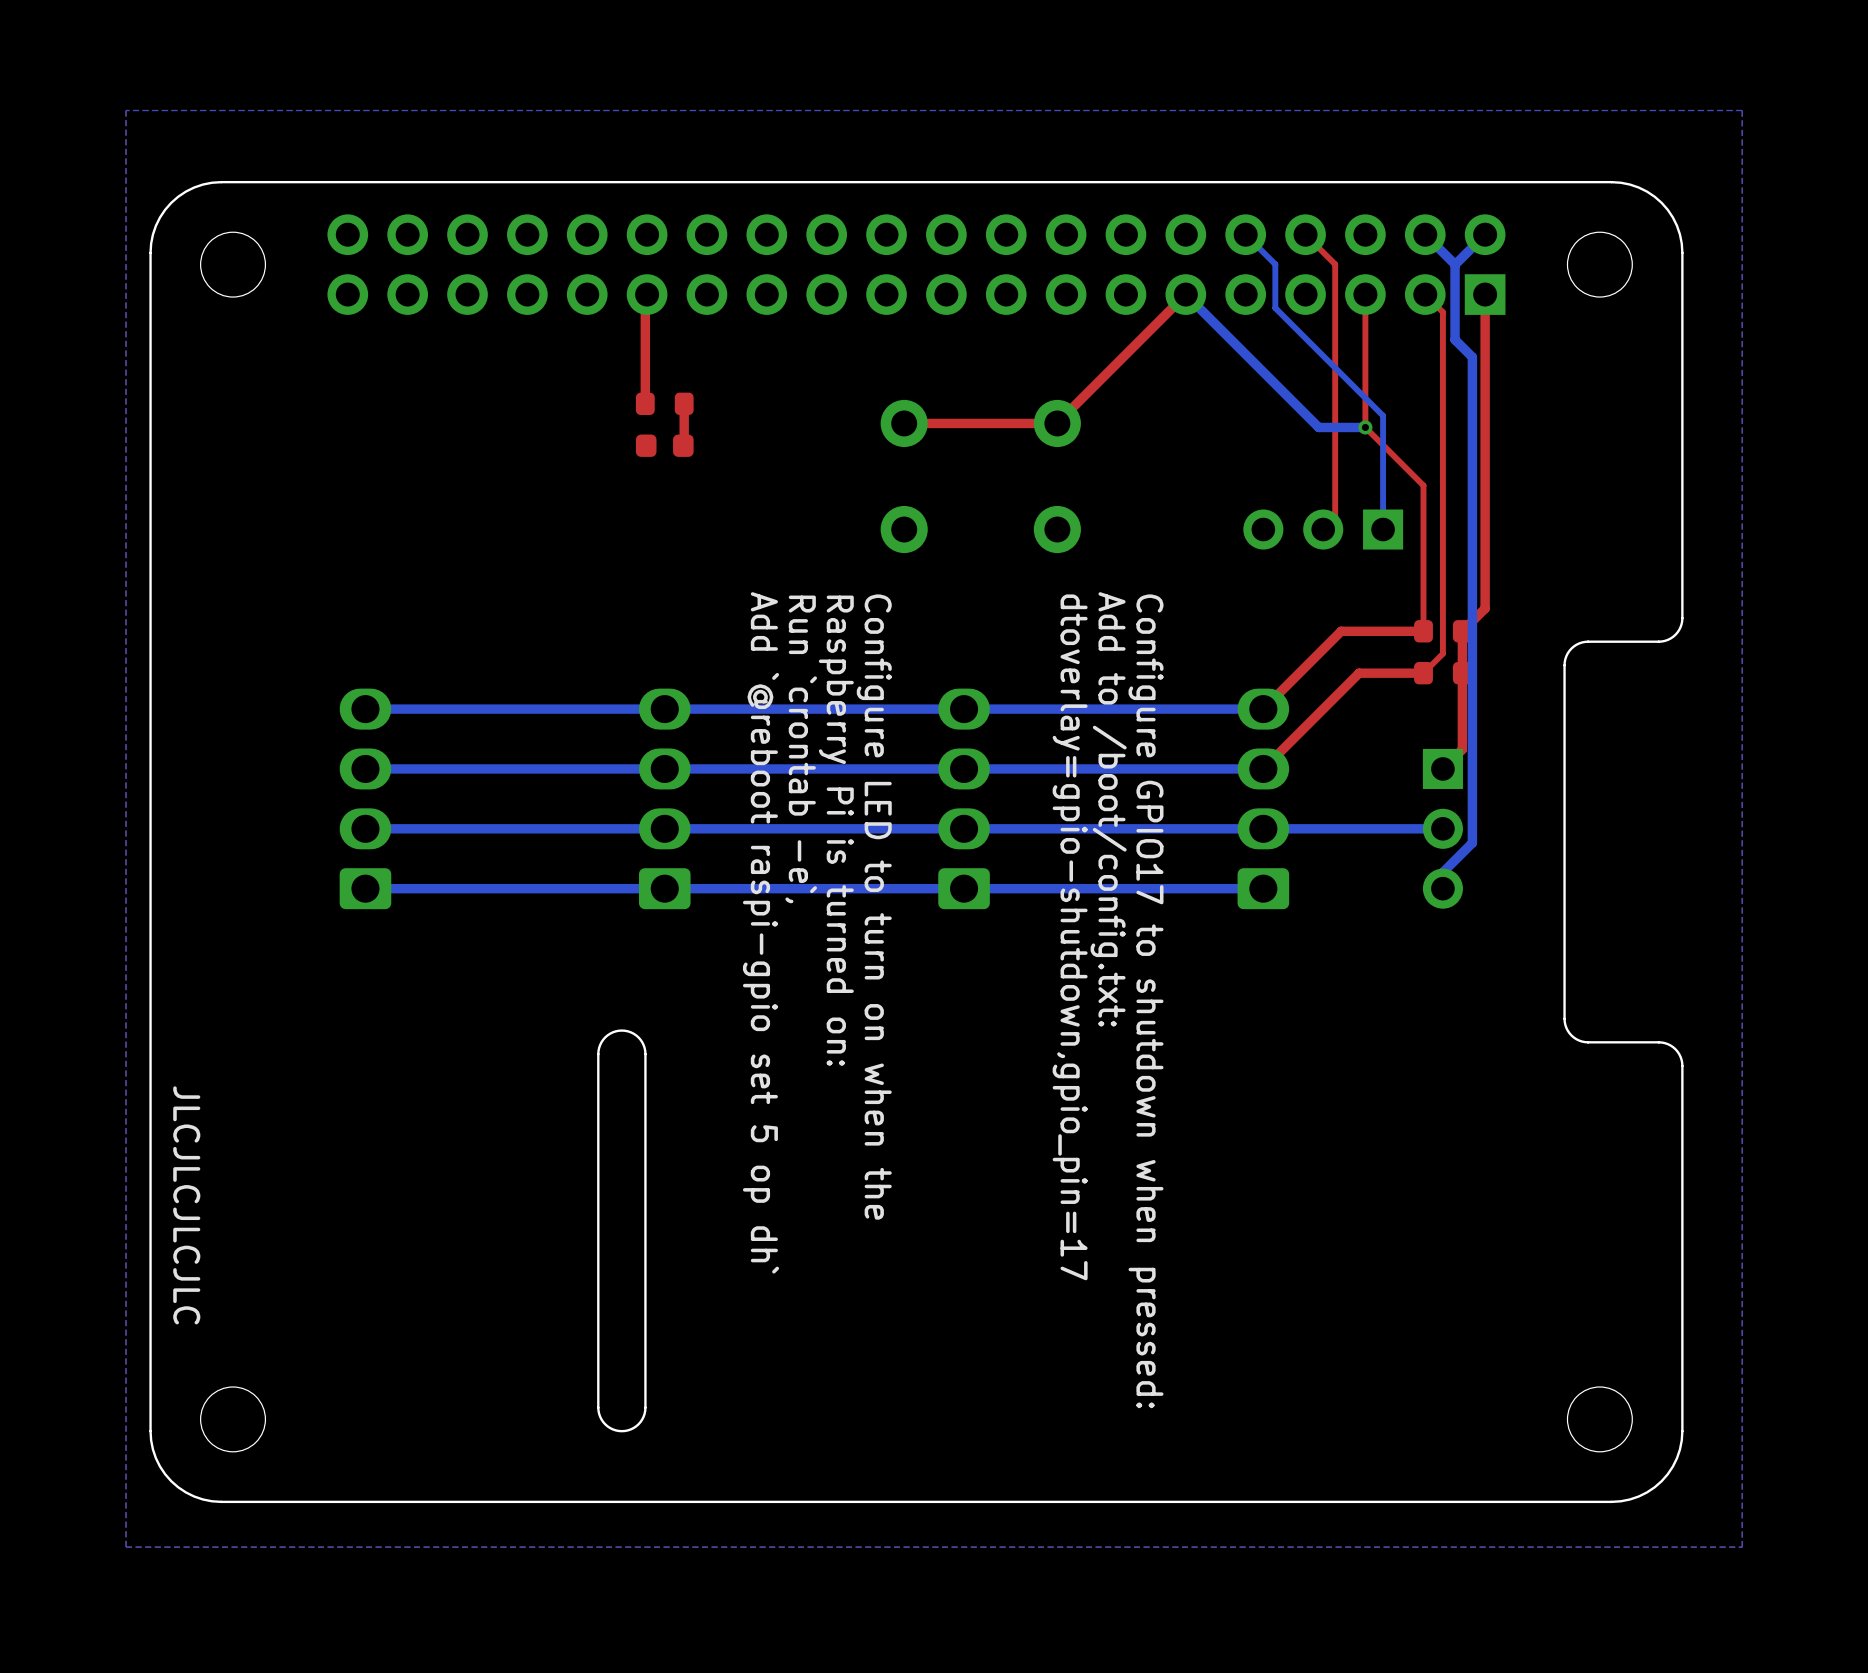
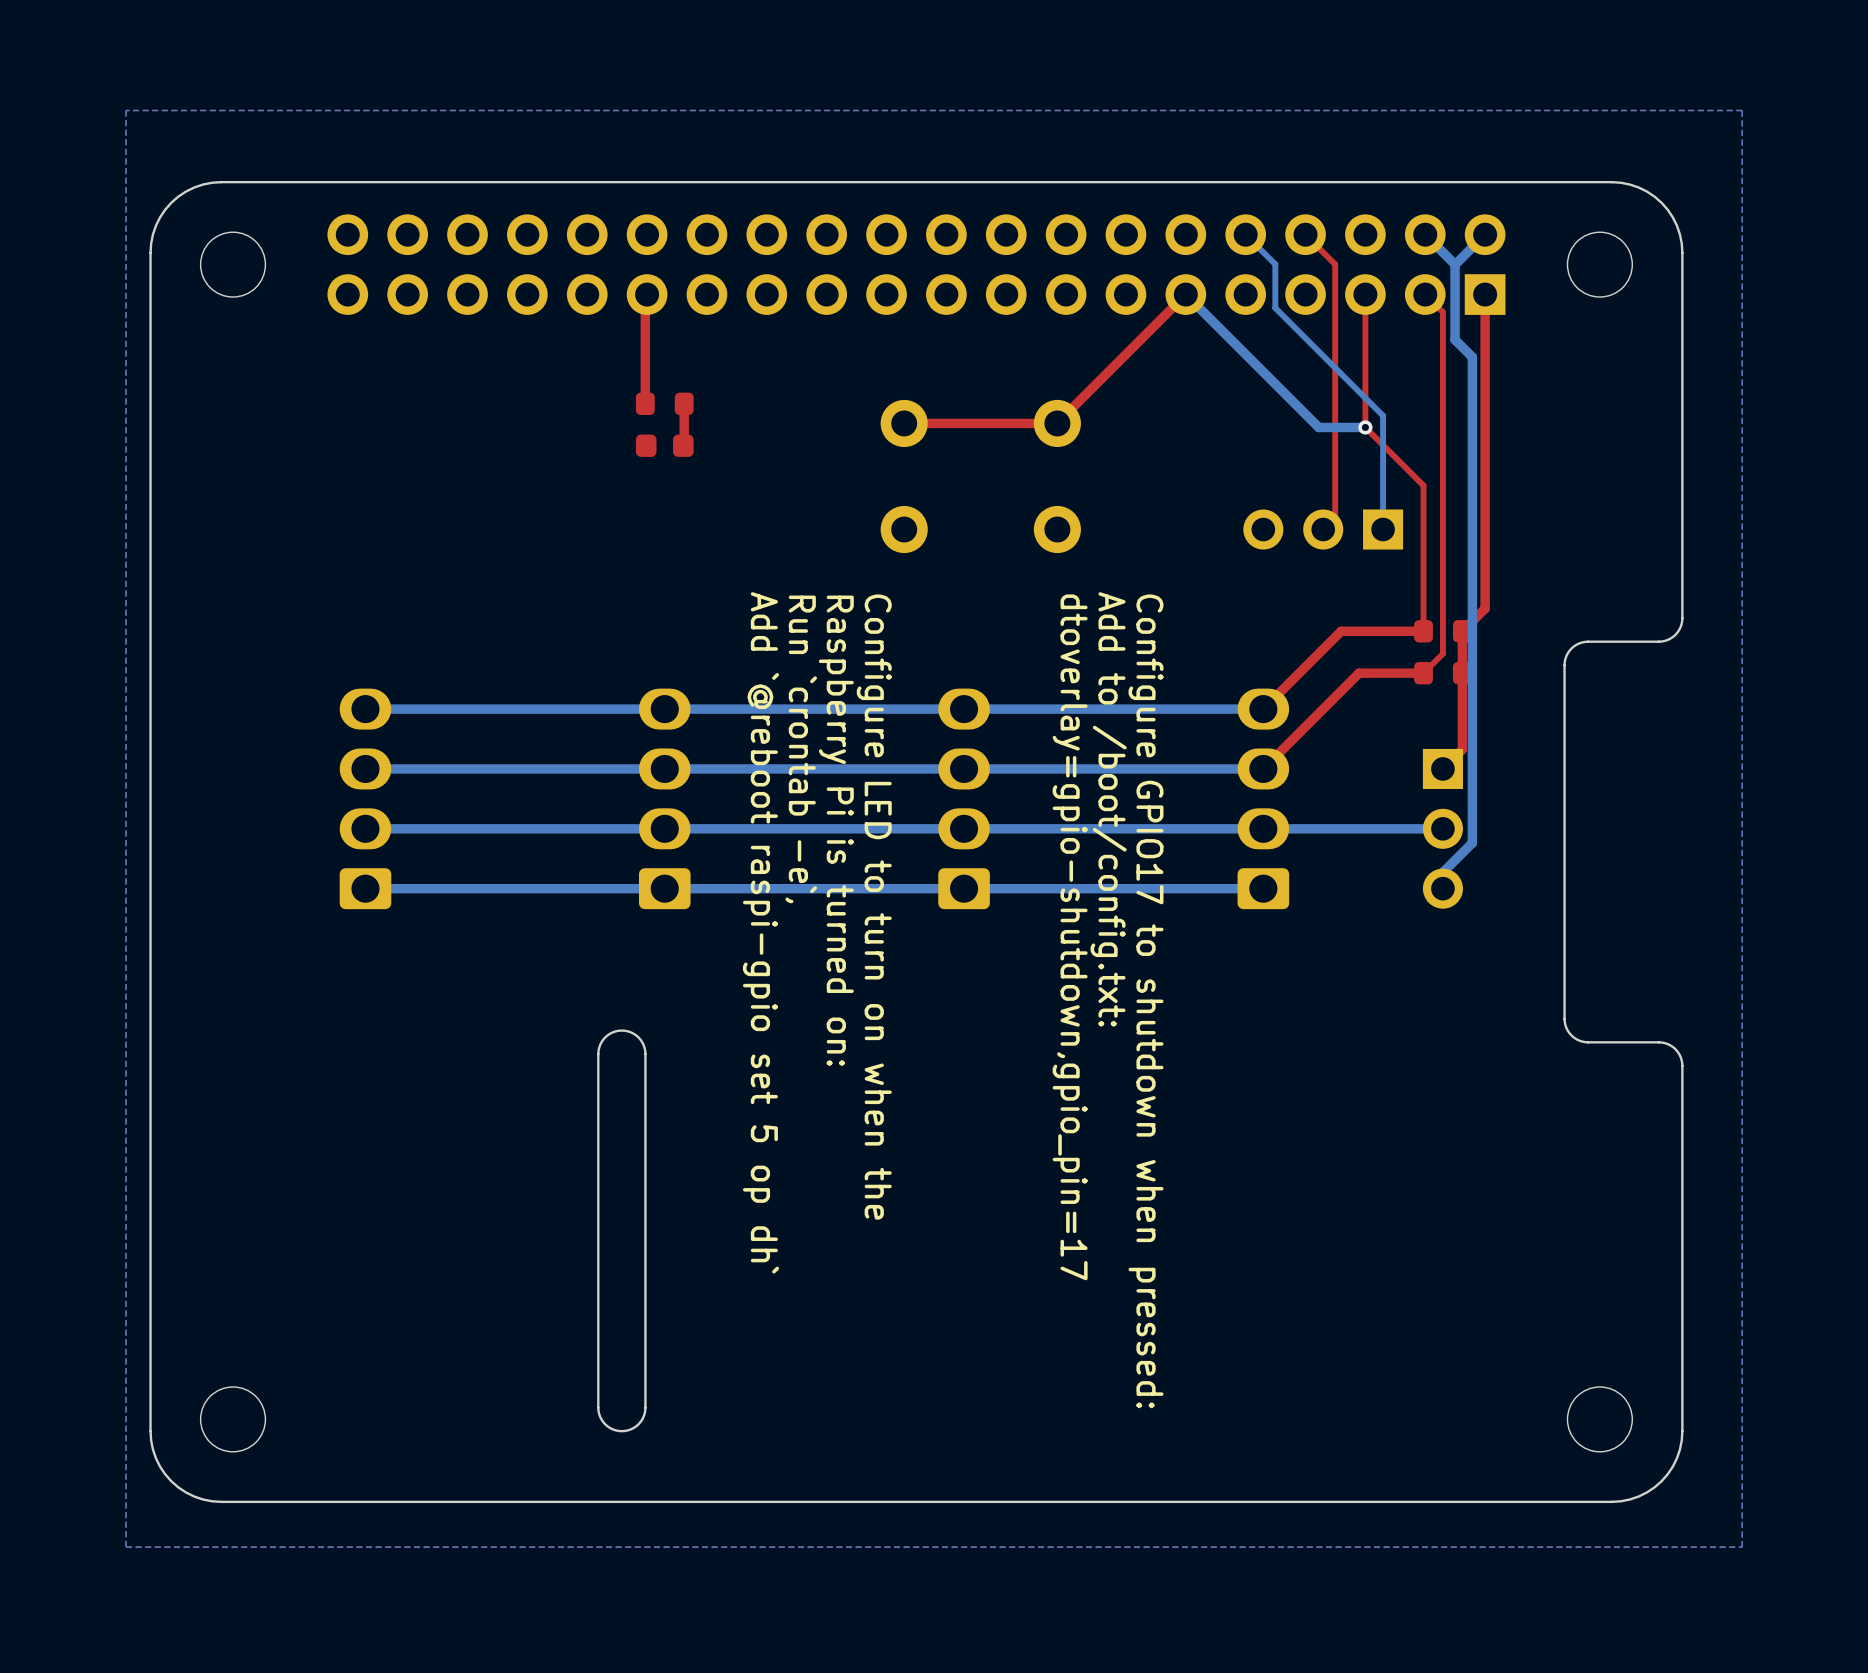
text: JLCJLCJLCJLC (186, 1205) -> none

